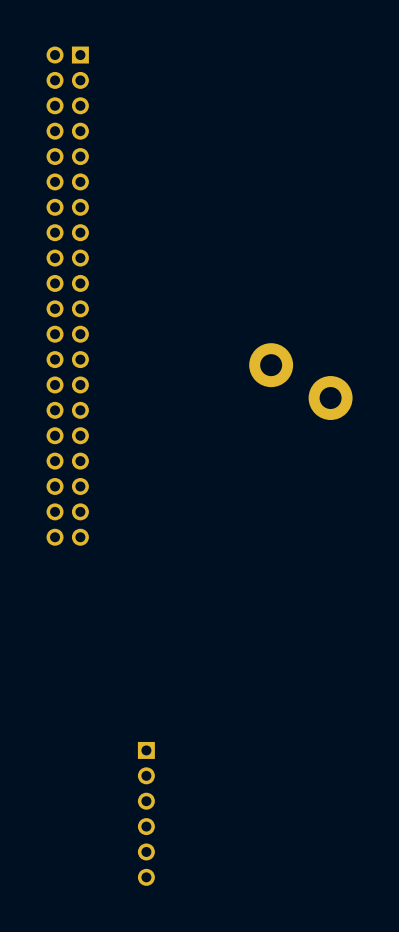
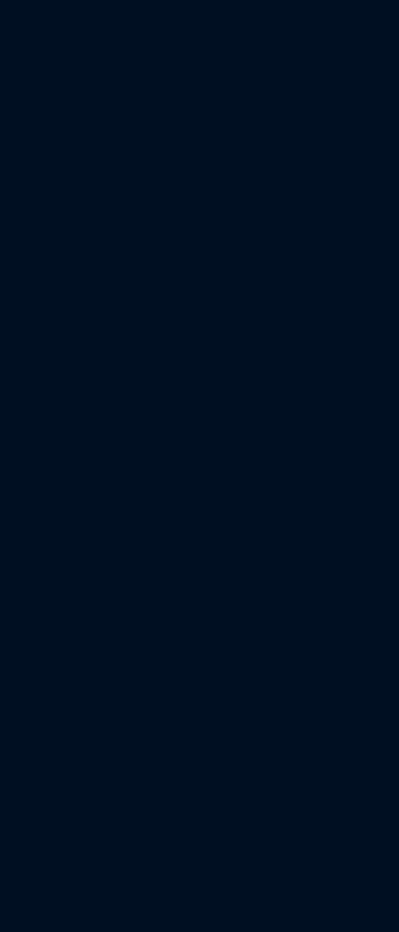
part: (67, 296) -> none
part: (271, 365) -> none
part: (330, 398) -> none
part: (146, 813) -> none

